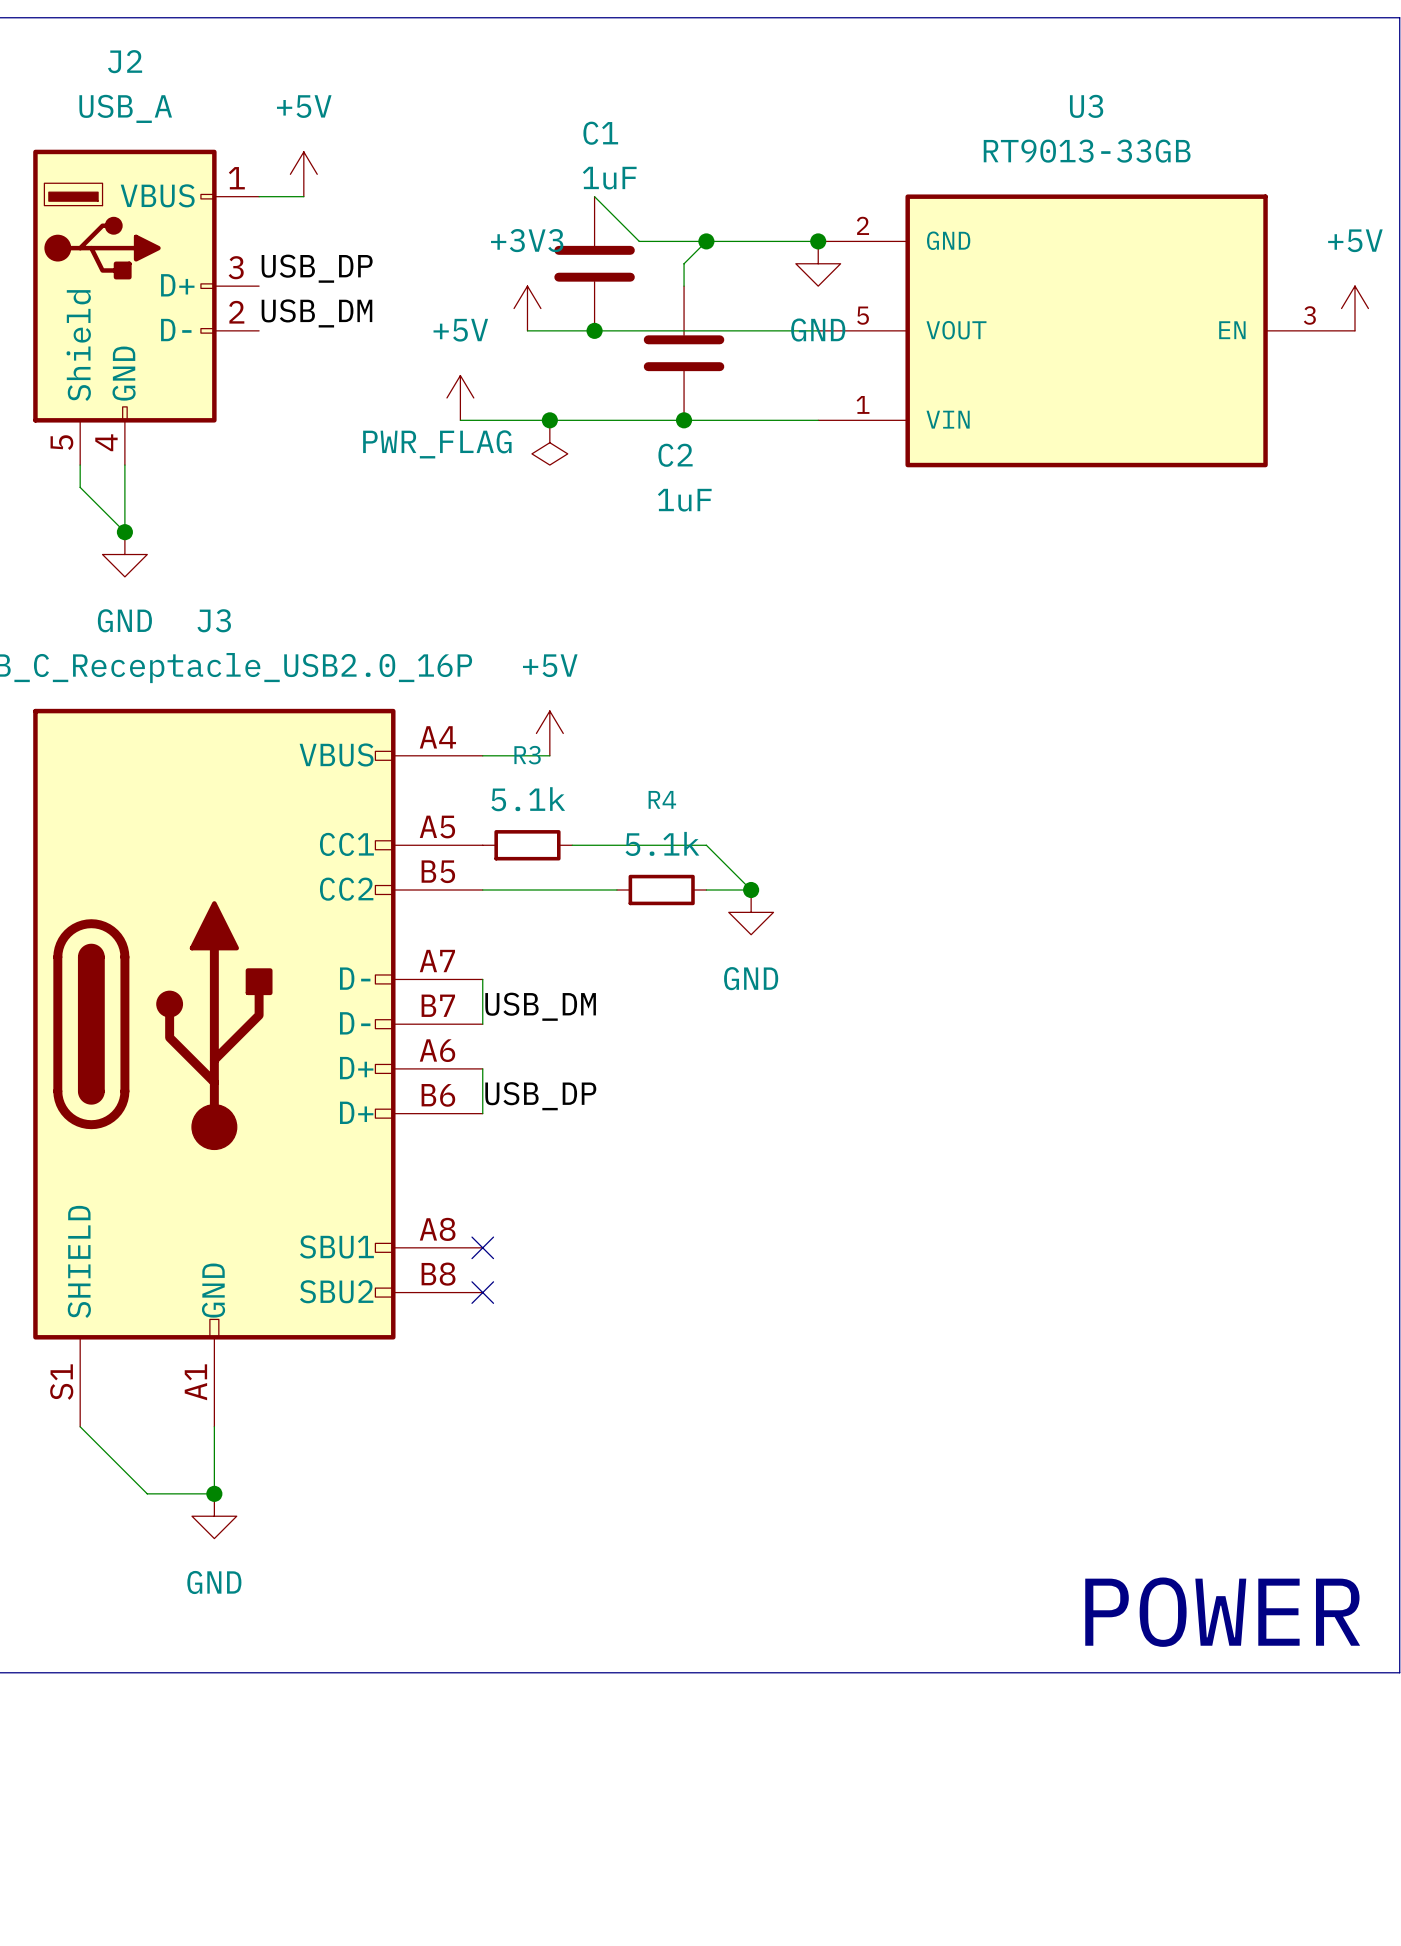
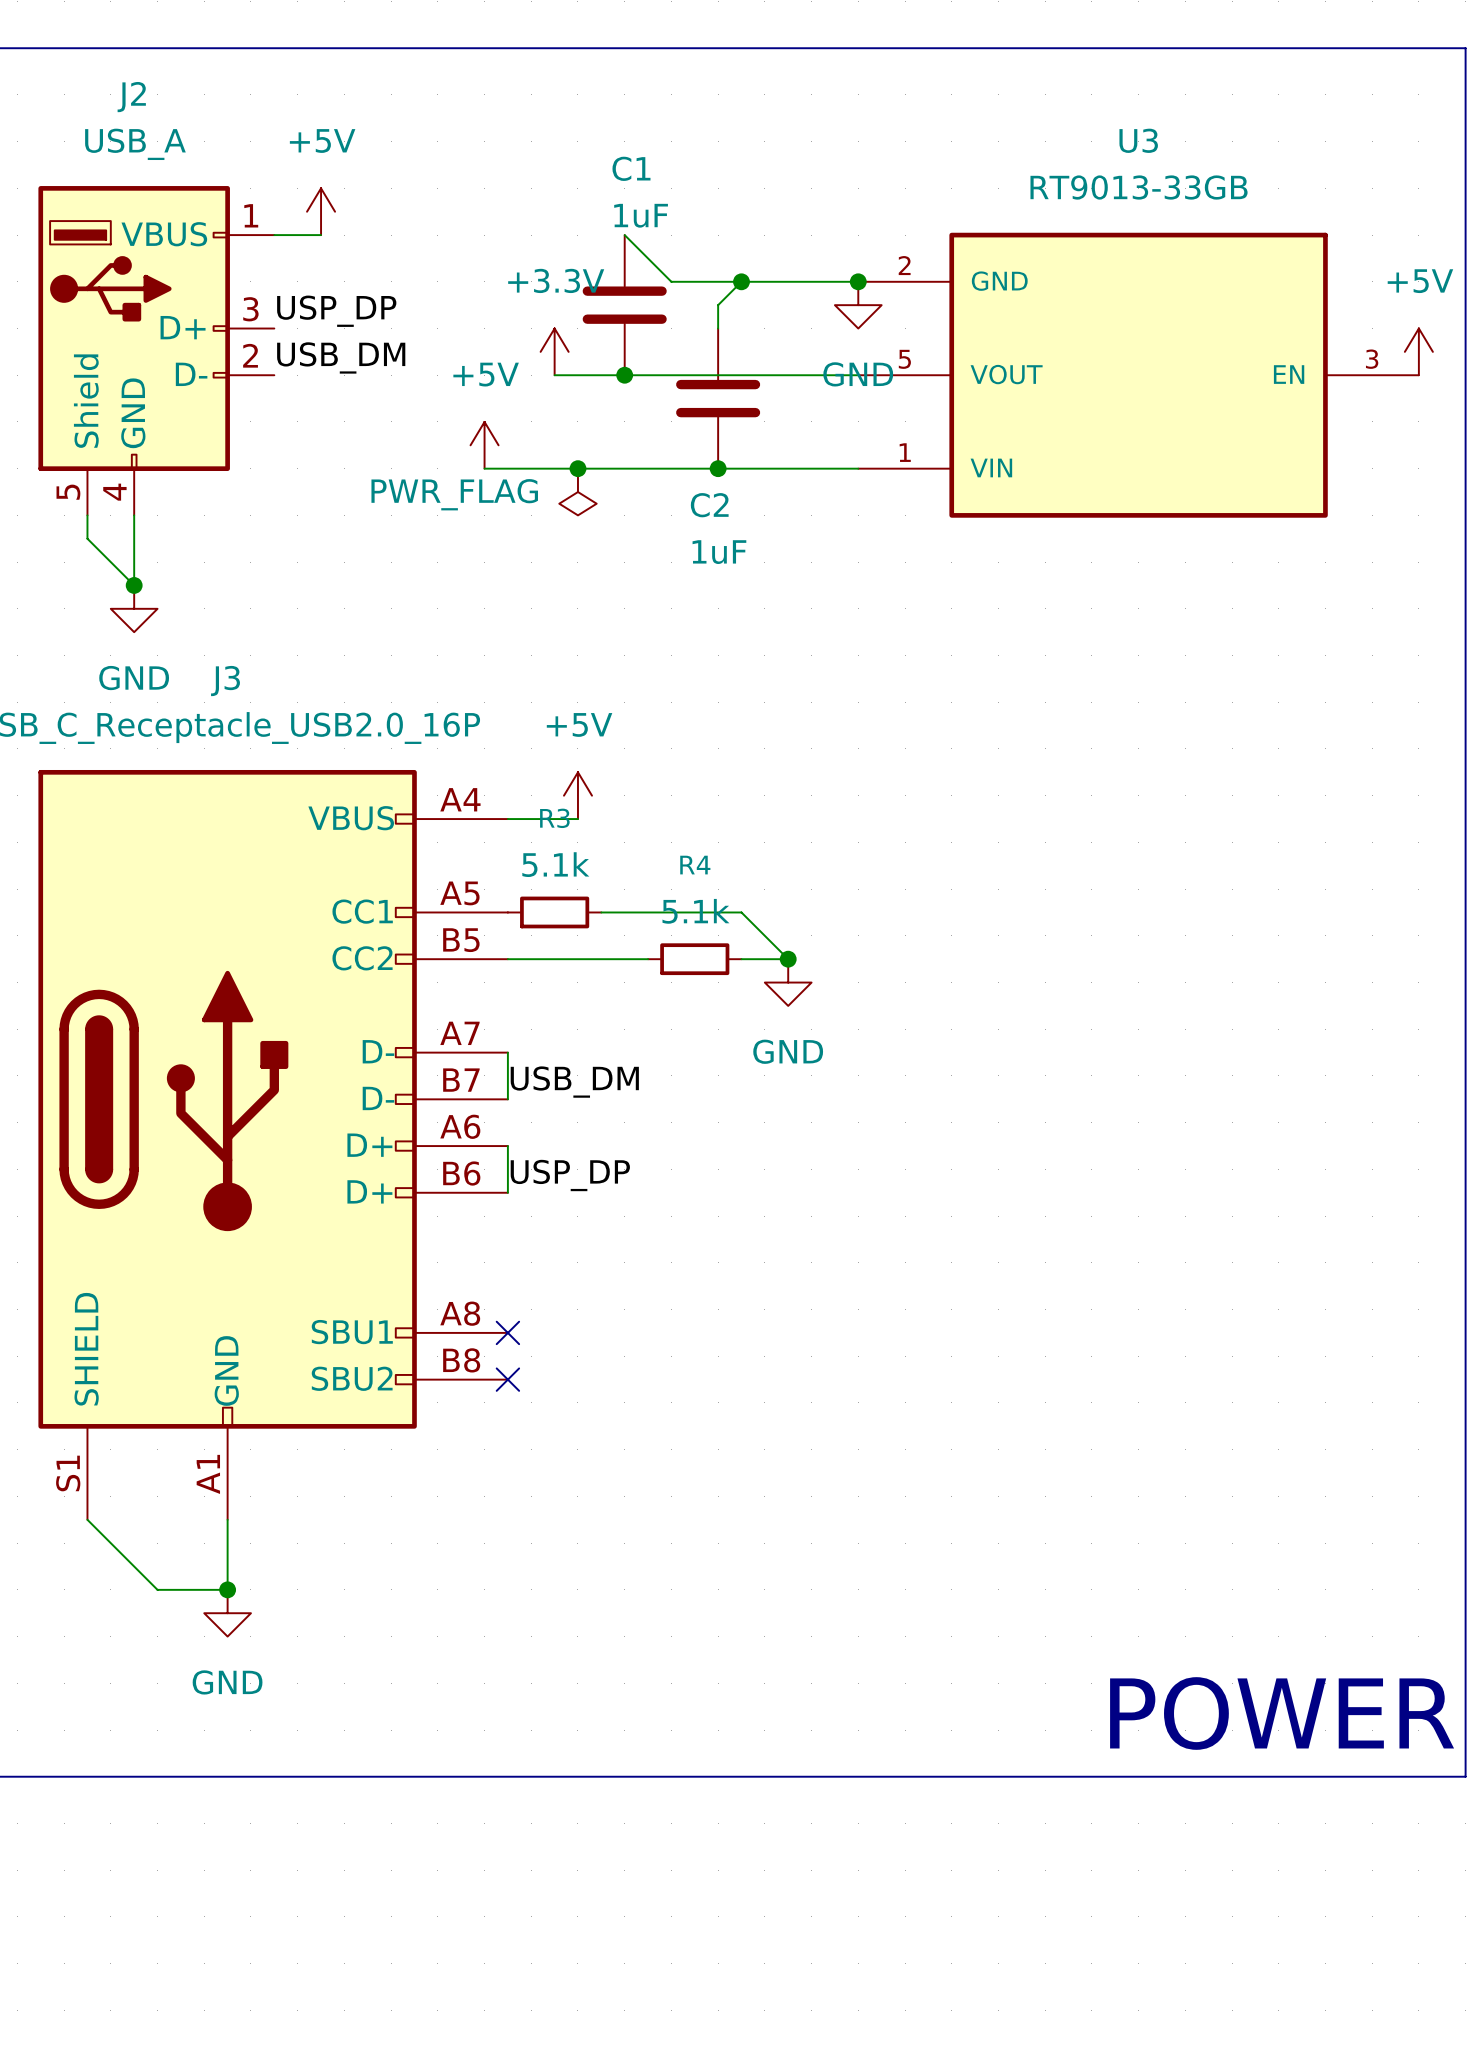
label: USB_DP (317, 268) -> USP_DP (336, 311)
power symbol: +3V3 (527, 308) -> +3.3V (554, 351)
label: USB_DP (540, 1096) -> USP_DP (570, 1175)

